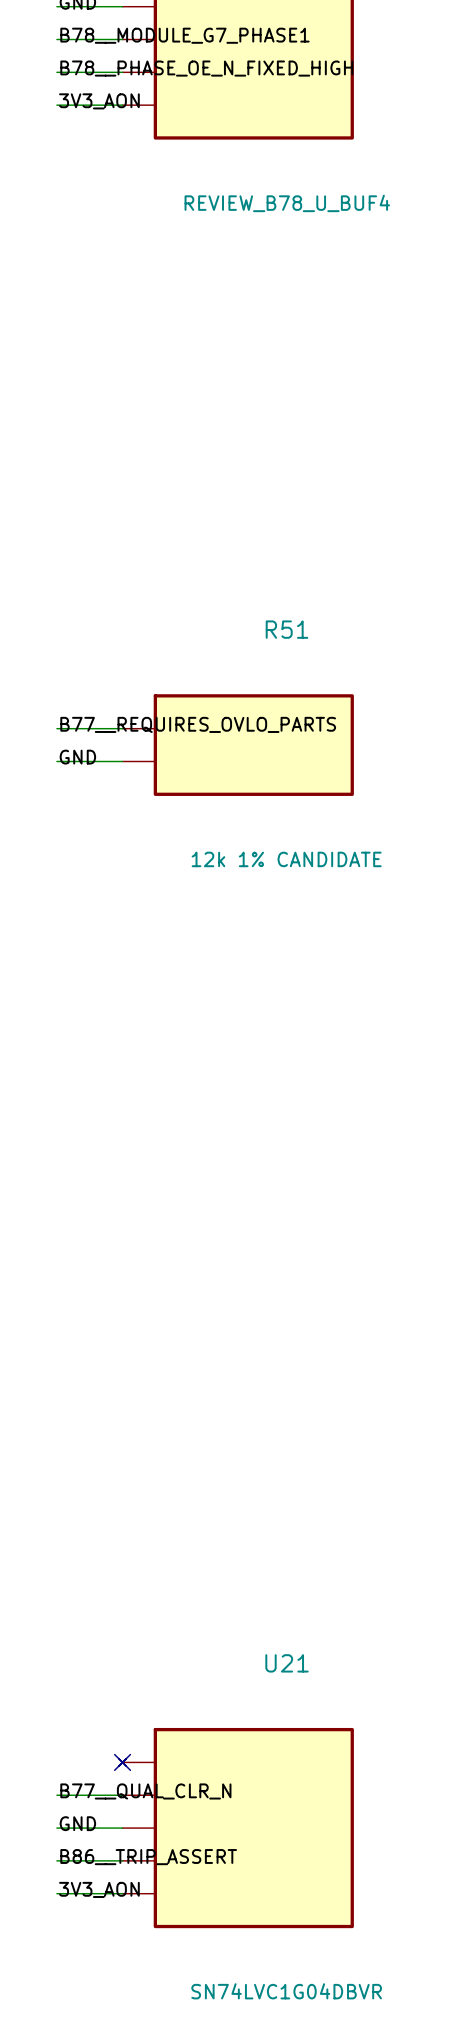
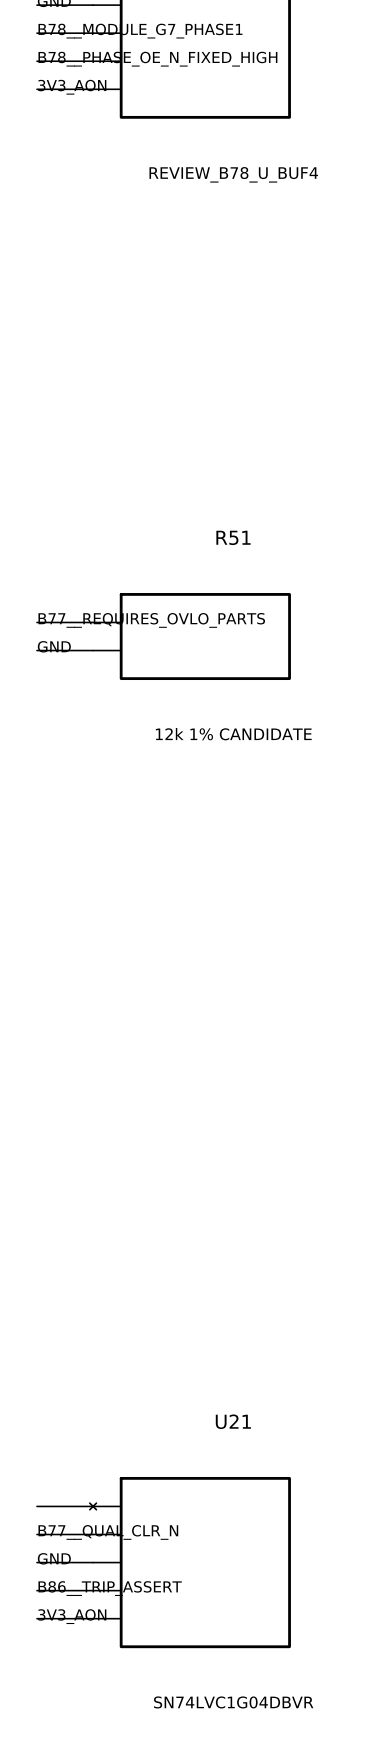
wire: none -> (36, 1506) (93, 1506)
no-connect mark: (122, 1762) -> none

